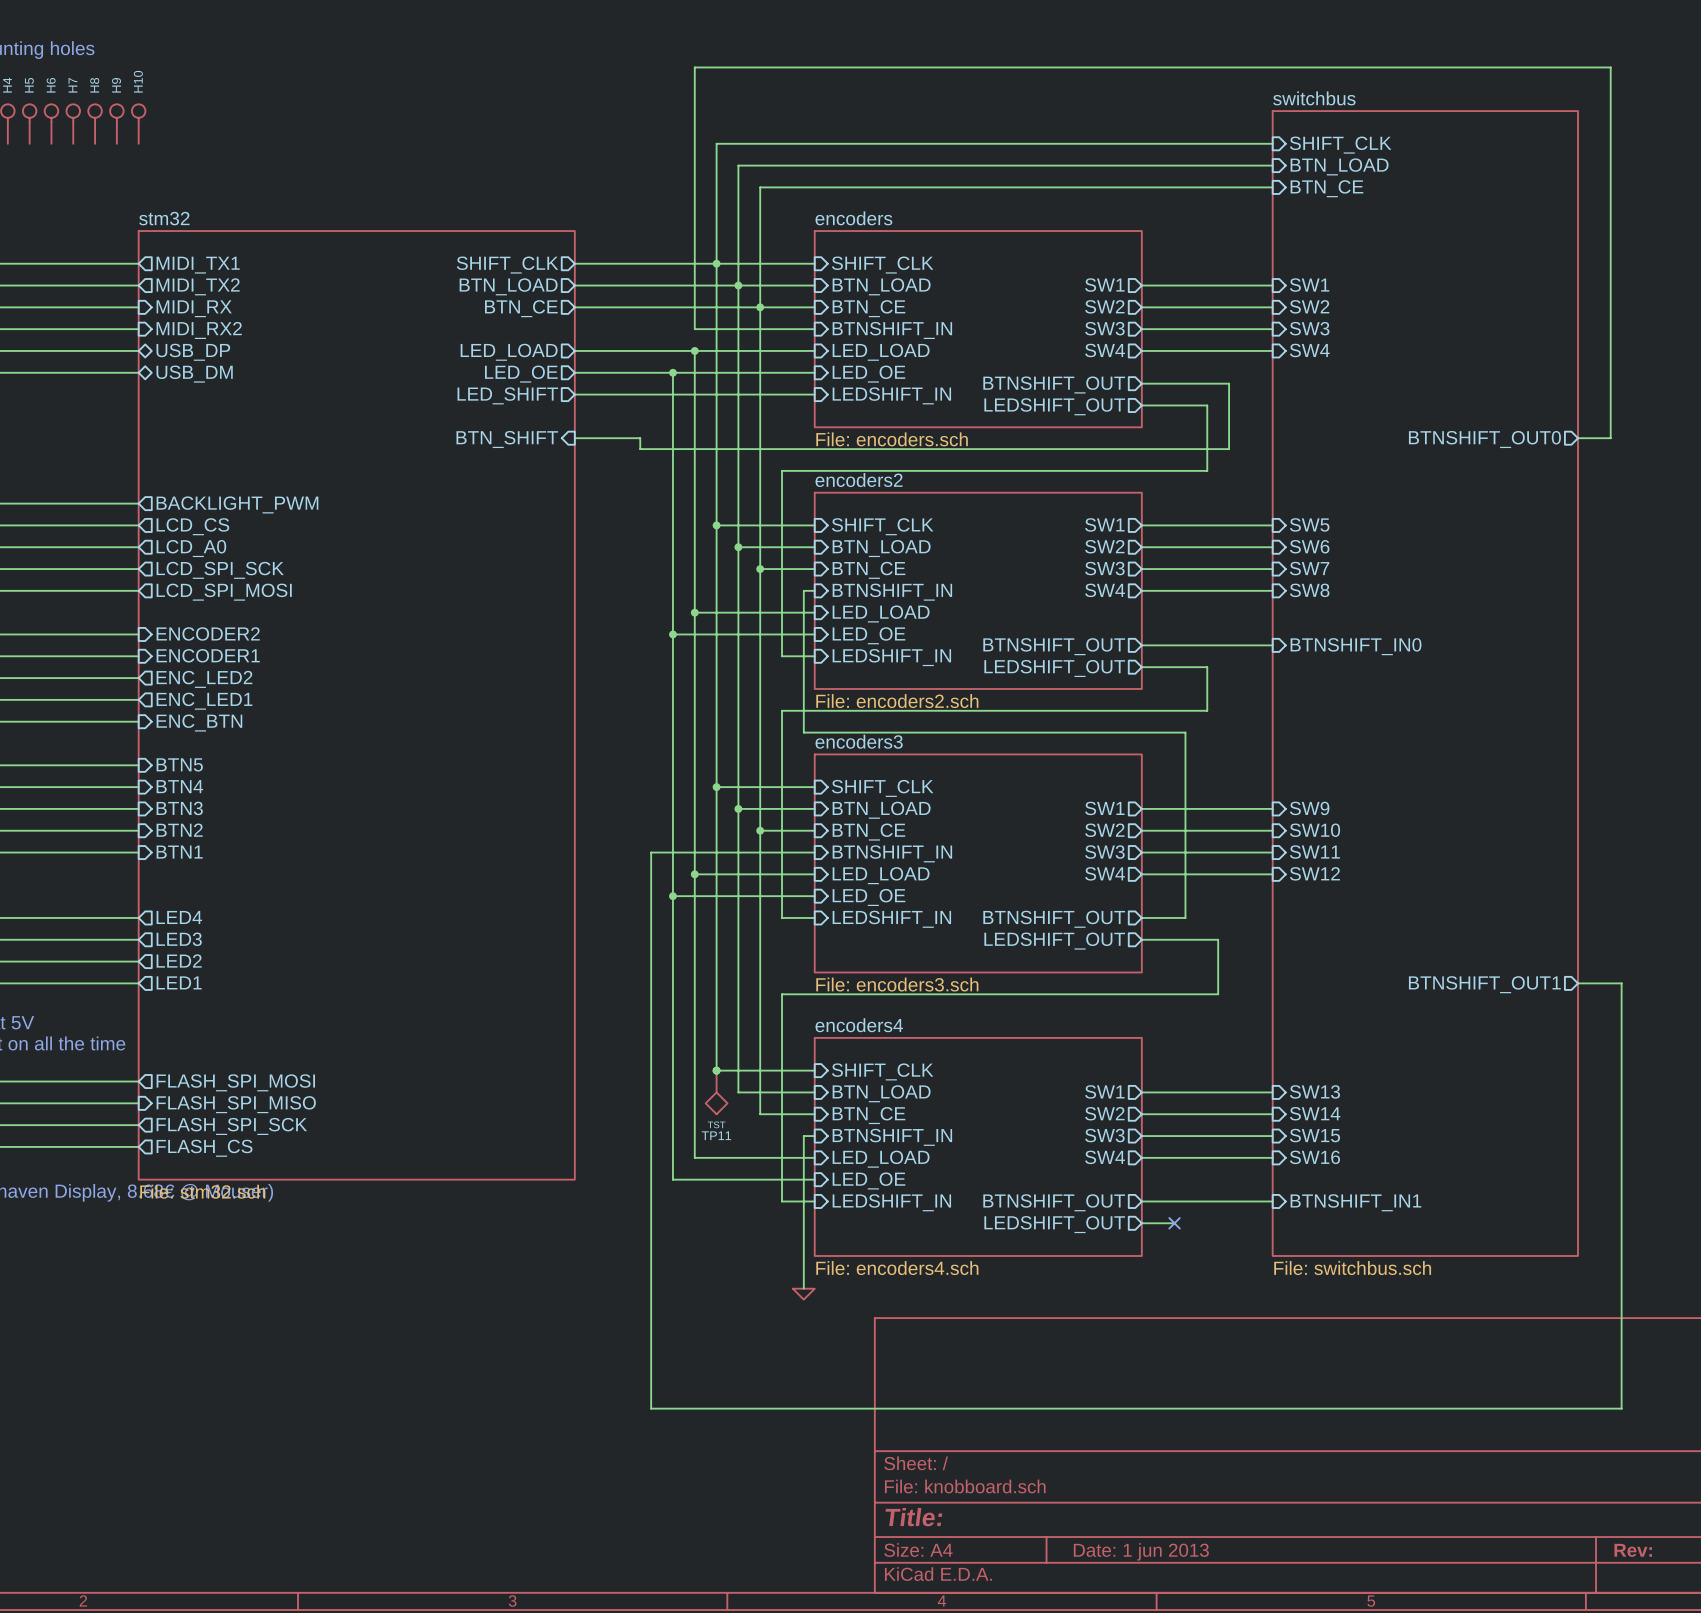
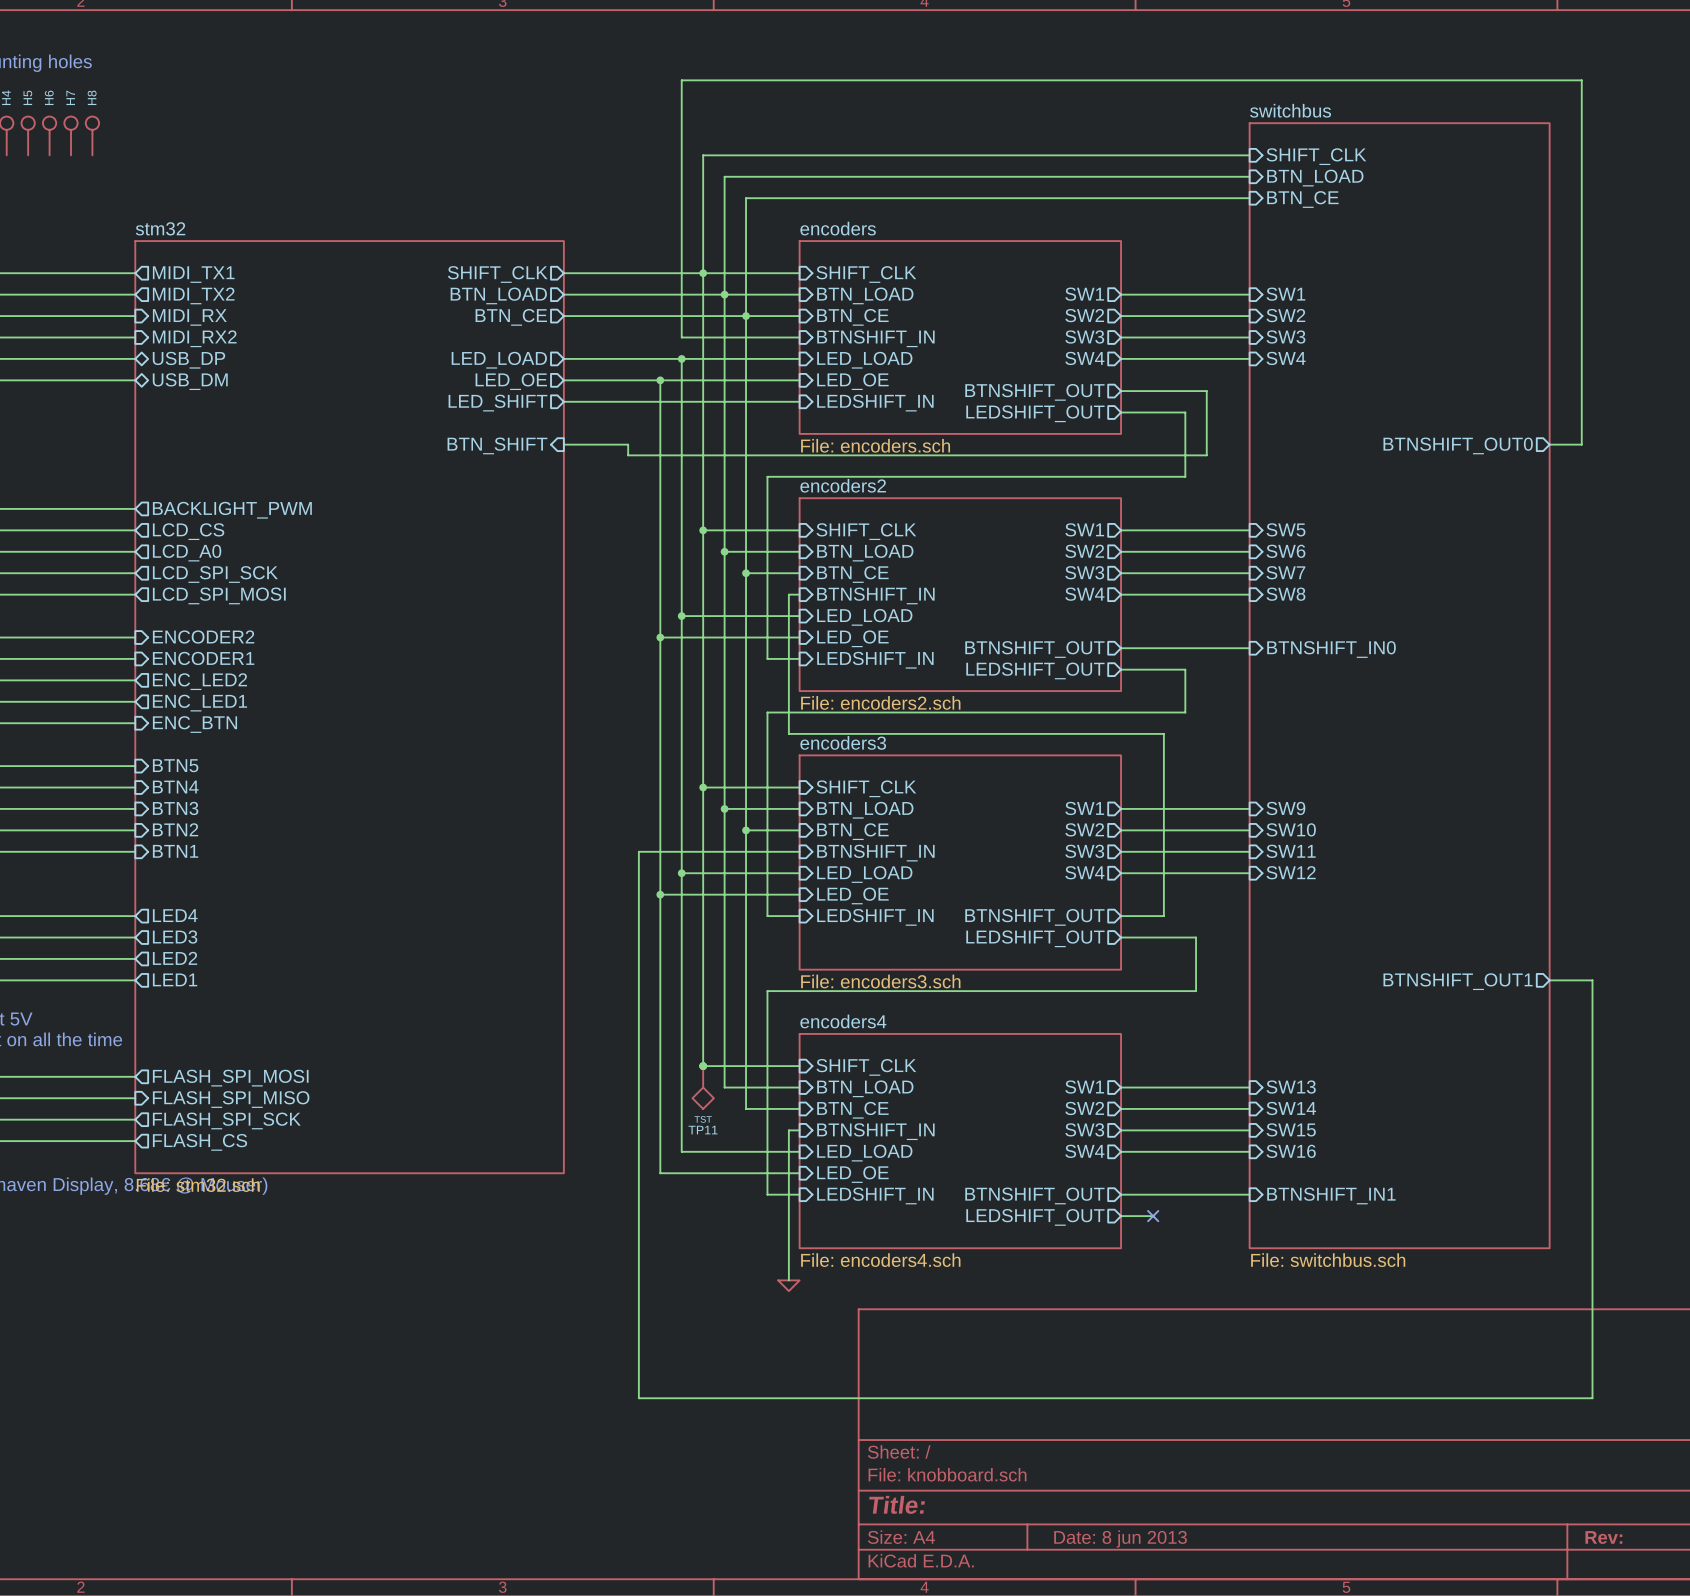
H9: (116, 124) -> none
H10: (138, 124) -> none
title block: Date: 1 jun 2013 (1141, 1551) -> Date: 8 jun 2013 (1120, 1539)

